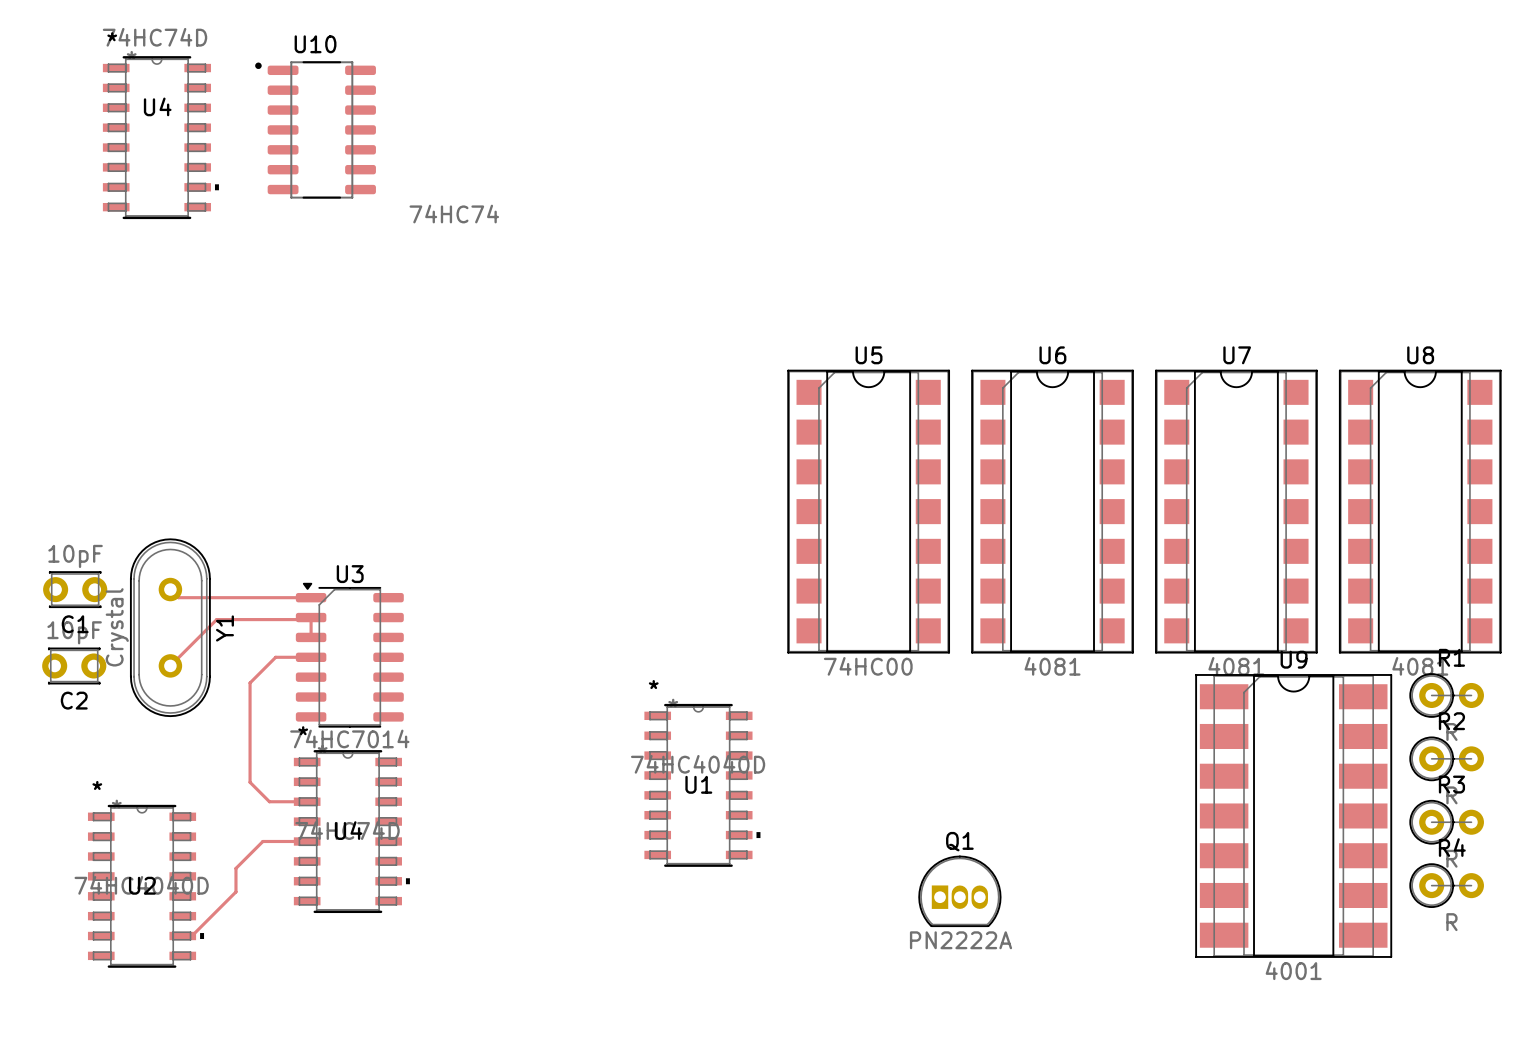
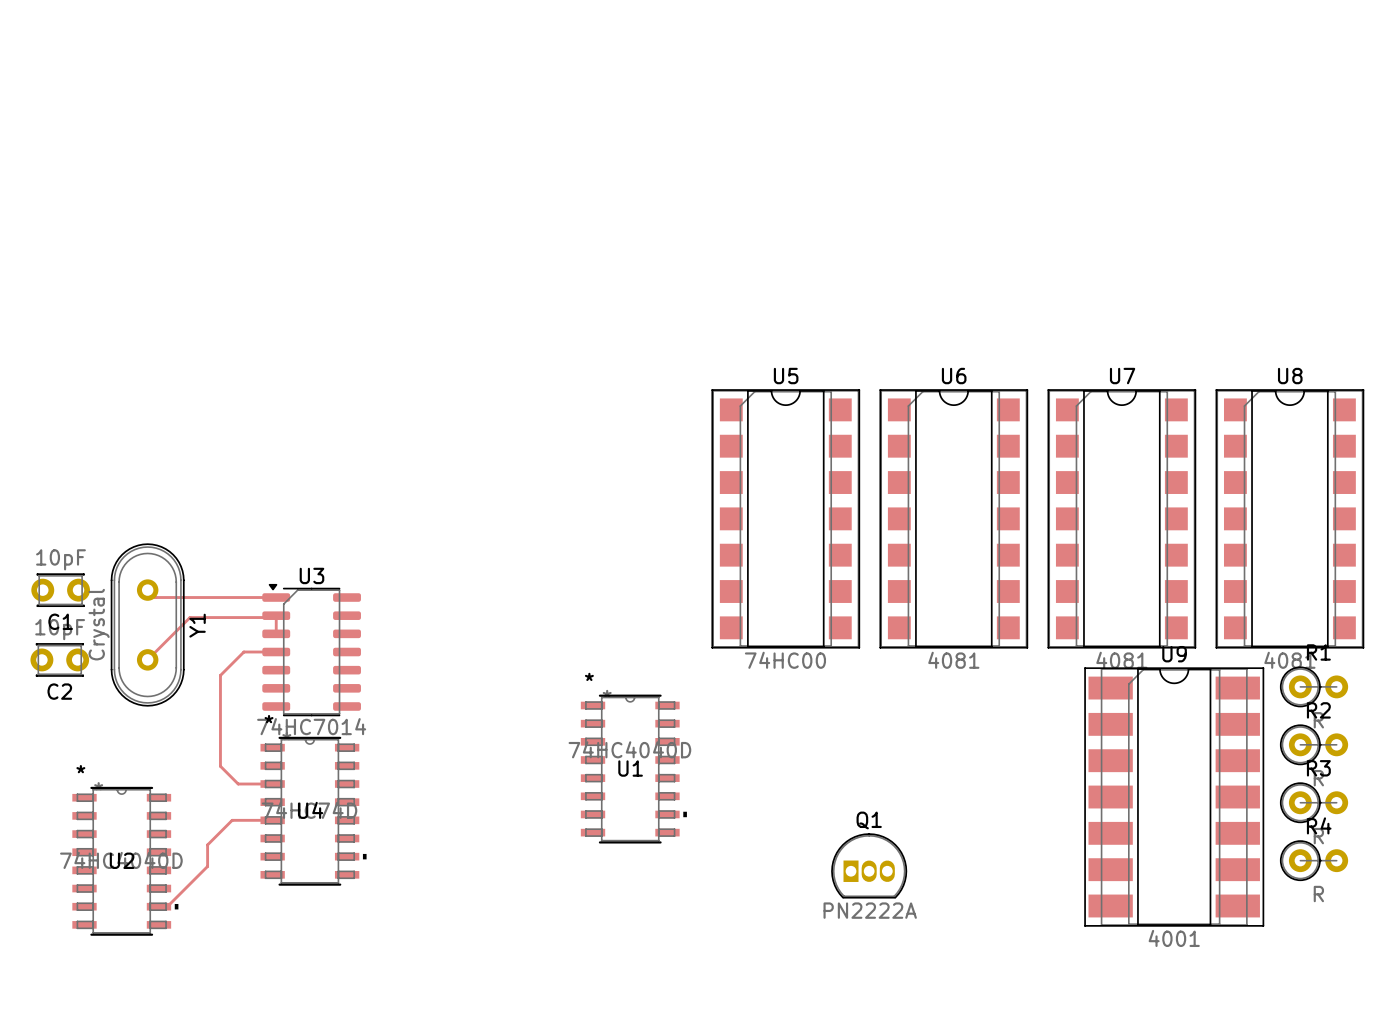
U10: 74HC74 (315, 129) -> none
U4: 74HC74D (160, 137) -> none

